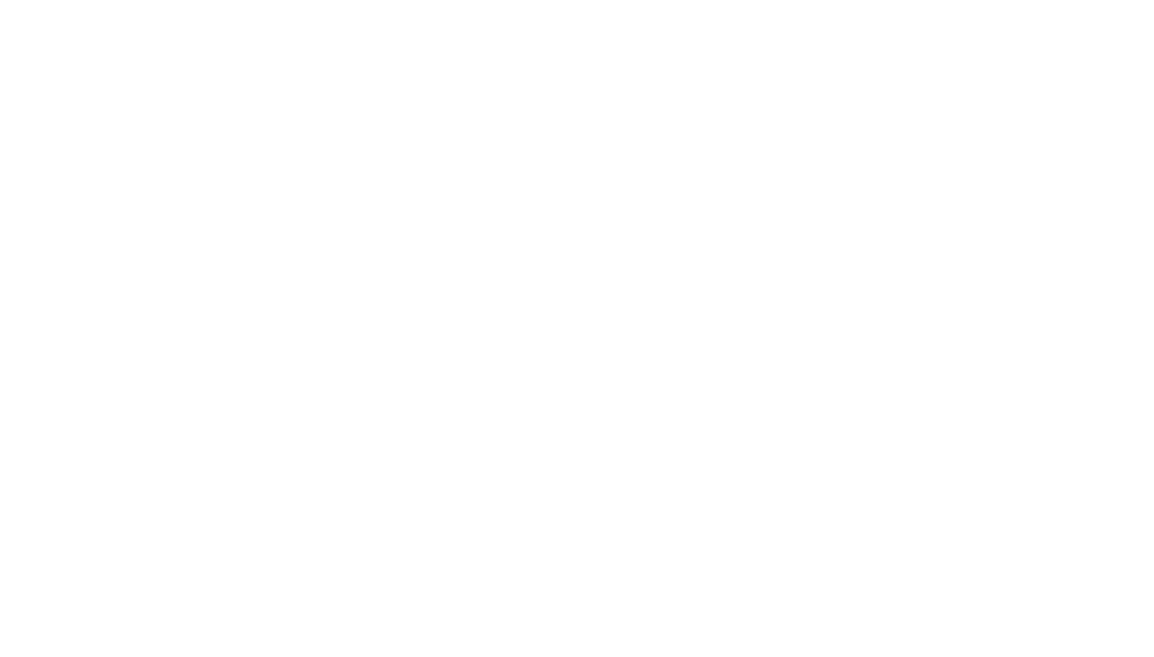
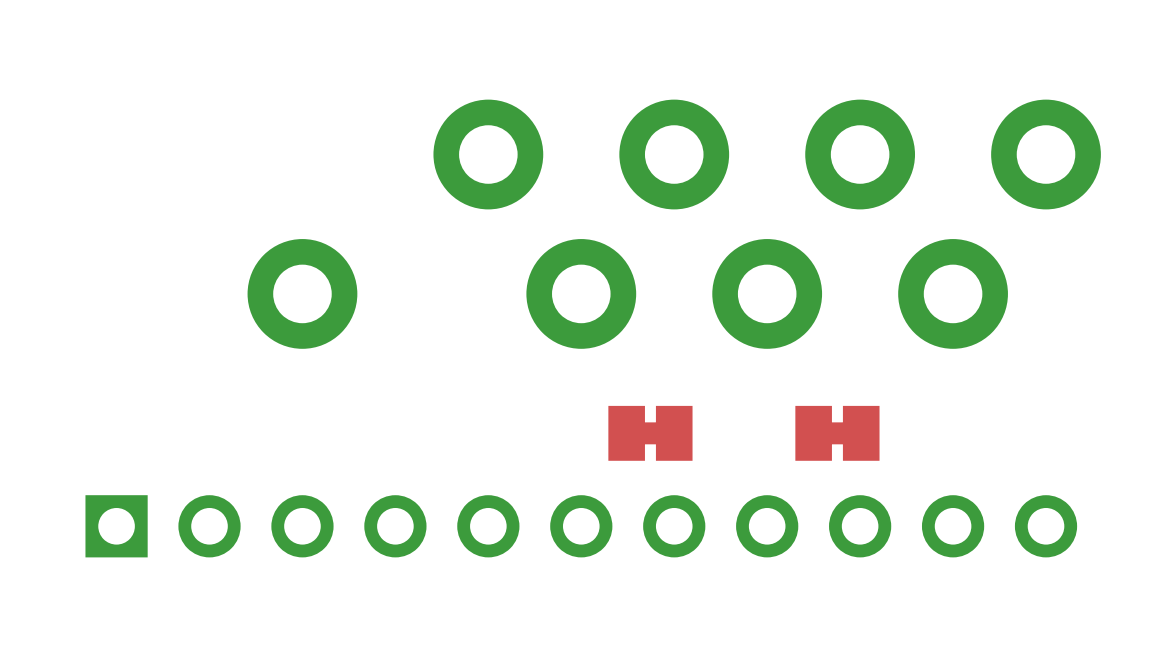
part: none -> (488, 154)
part: none -> (674, 154)
part: none -> (860, 154)
part: none -> (1046, 154)
part: none -> (302, 293)
part: none -> (581, 293)
part: none -> (767, 293)
part: none -> (953, 293)
part: none -> (650, 433)
part: none -> (837, 433)
part: none -> (581, 526)

